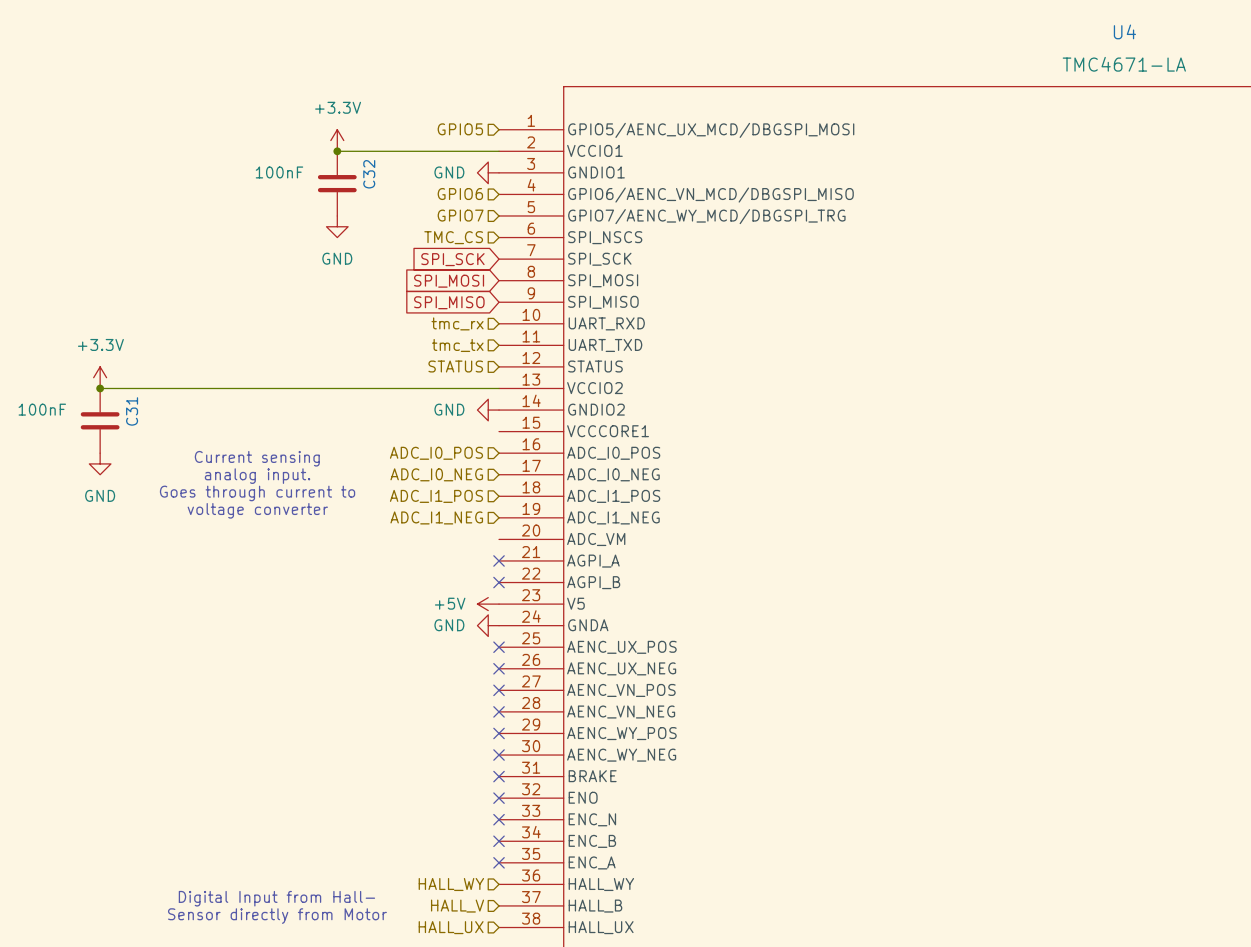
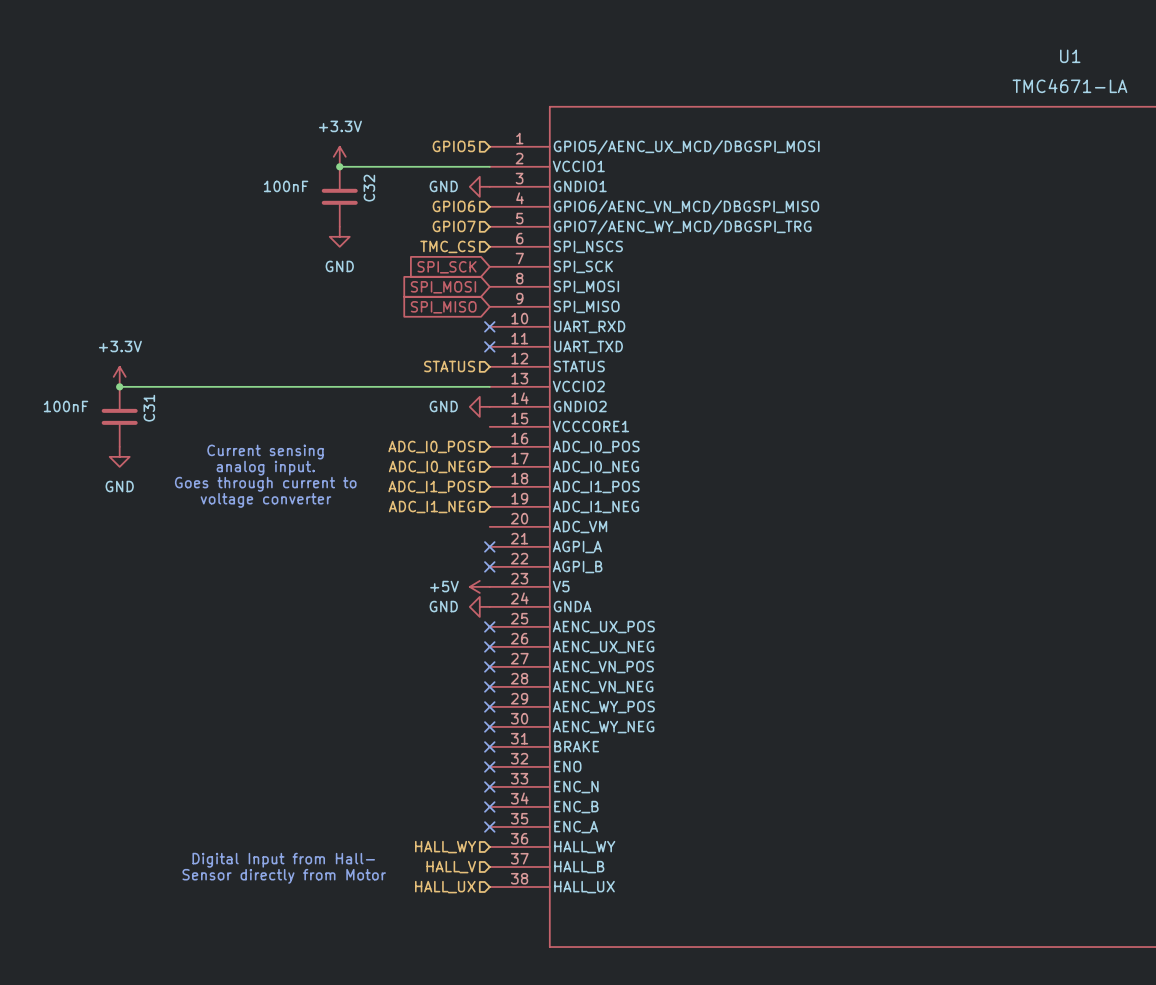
U4 name: U4 (1124, 31) -> U1 (1070, 56)
hierarchical label: tmc_rx (457, 323) -> none
no-connect mark: none -> (489, 326)
hierarchical label: tmc_tx (457, 345) -> none
no-connect mark: none -> (489, 346)

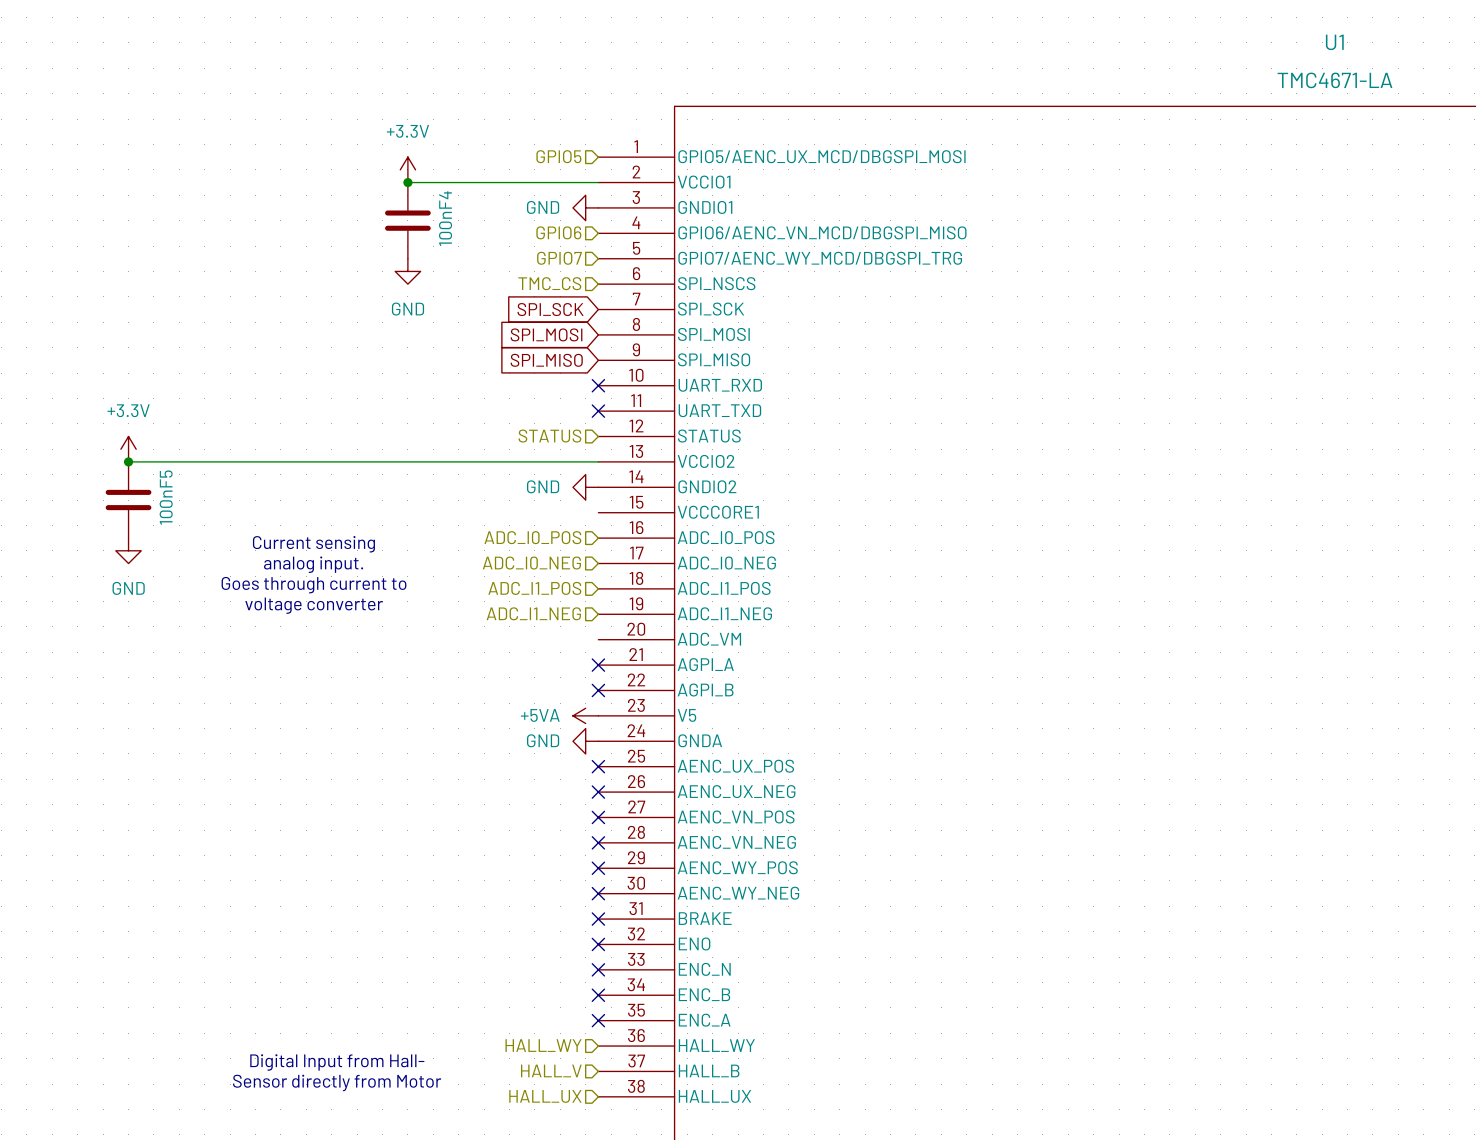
C32 value: 100nF (286, 186) -> none
C32 name: C32 (369, 188) -> 100nF4 (445, 218)
C31 value: 100nF (66, 406) -> none
C31 name: C31 (149, 408) -> 100nF5 (166, 497)
power symbol: +5V (479, 586) -> +5VA (585, 715)

